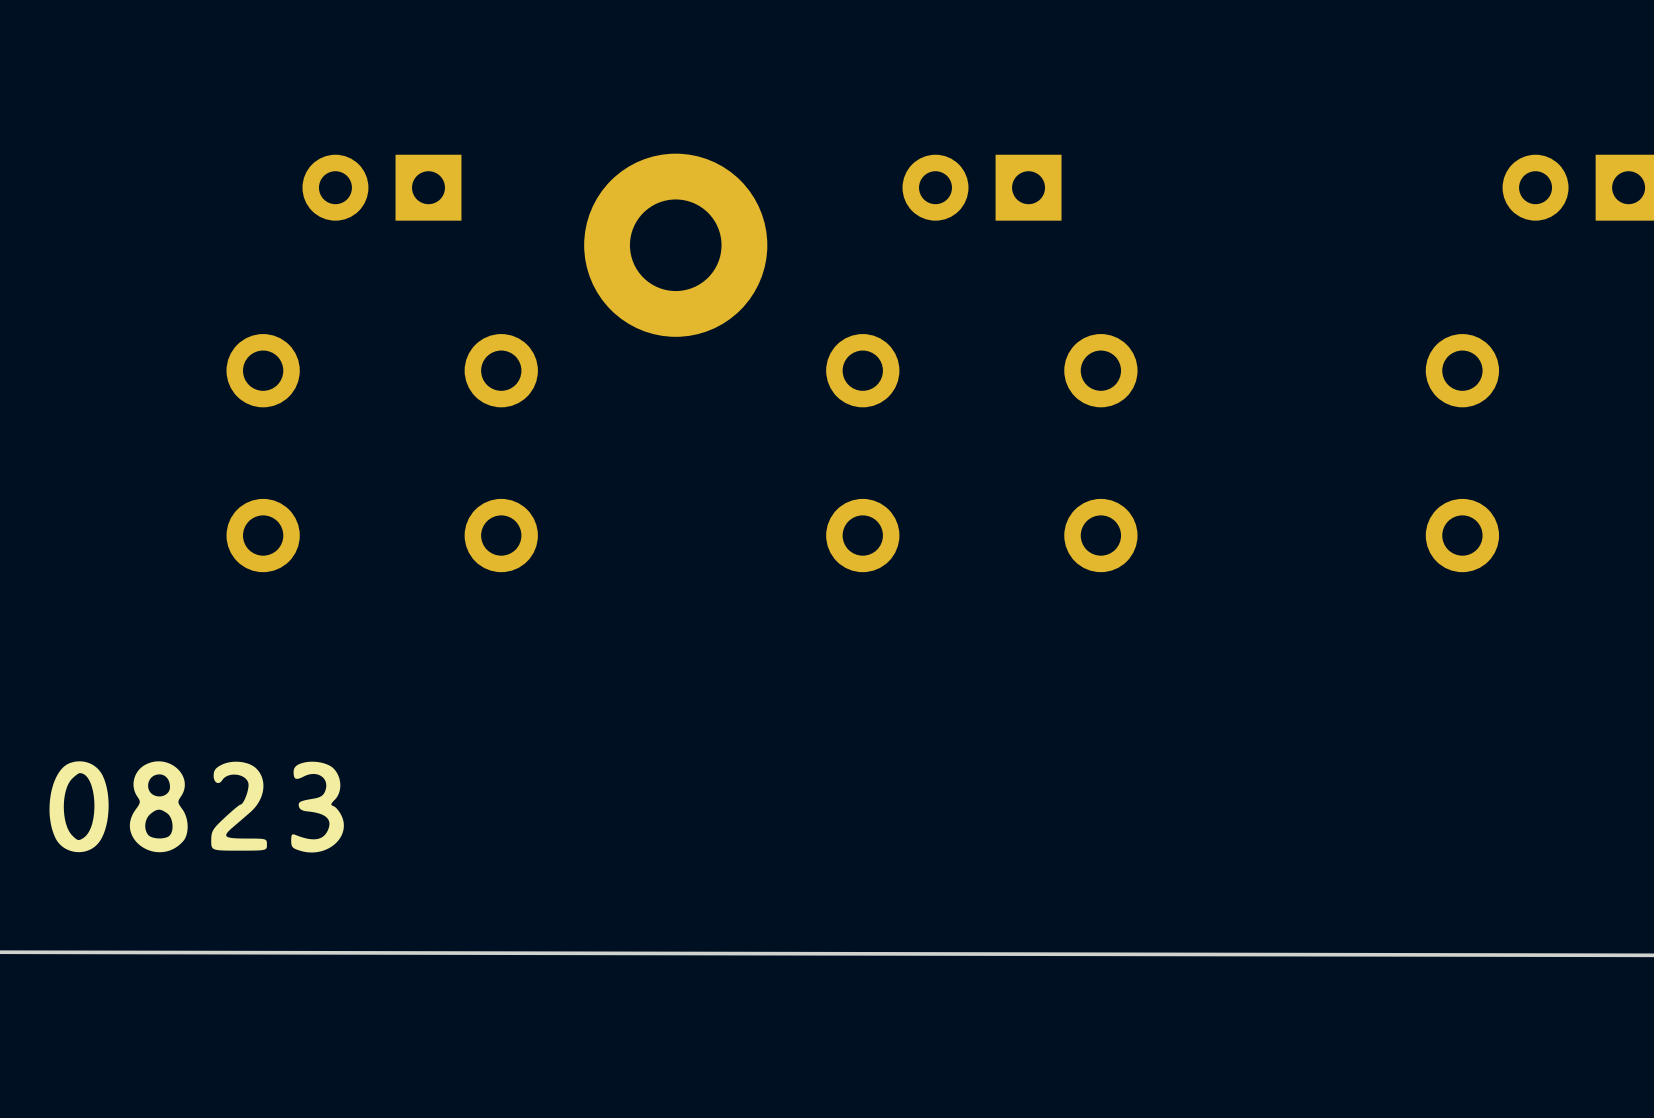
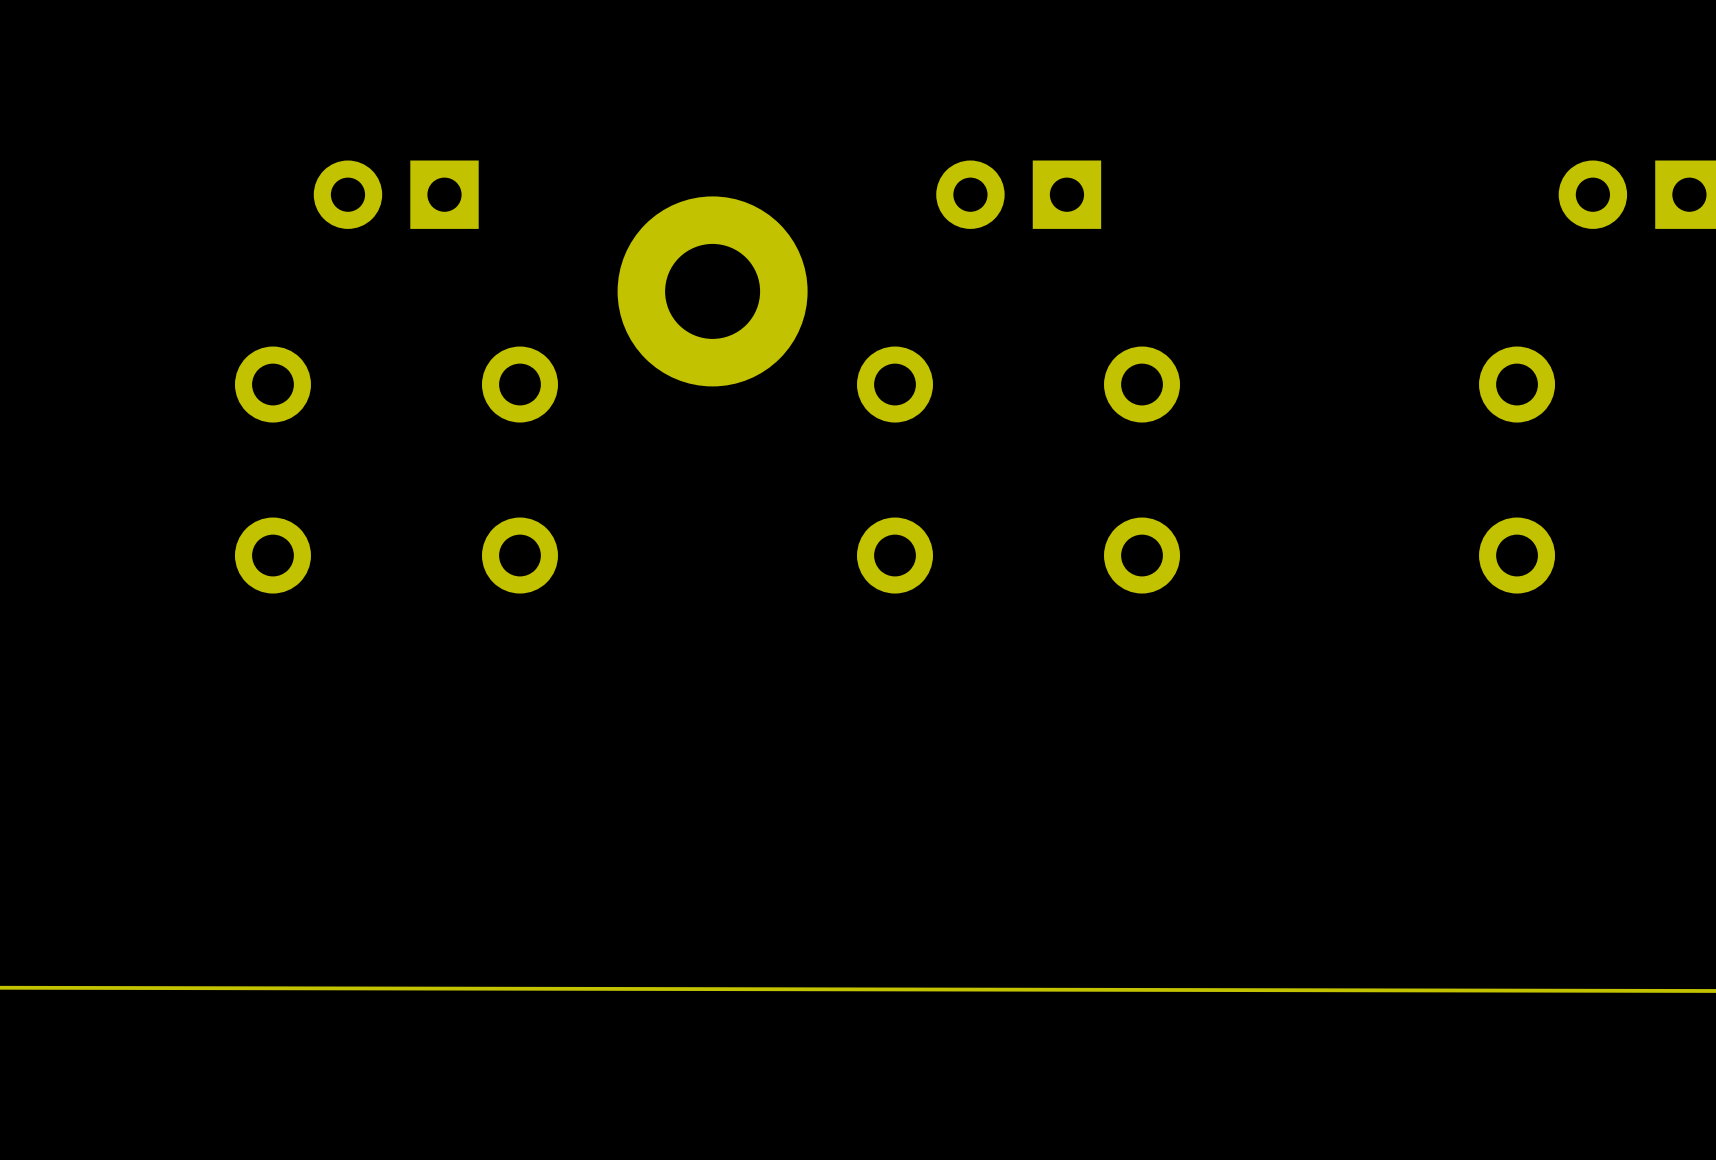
part position: (675, 245) -> (712, 291)
drawing: [49, 761, 344, 853] -> none

